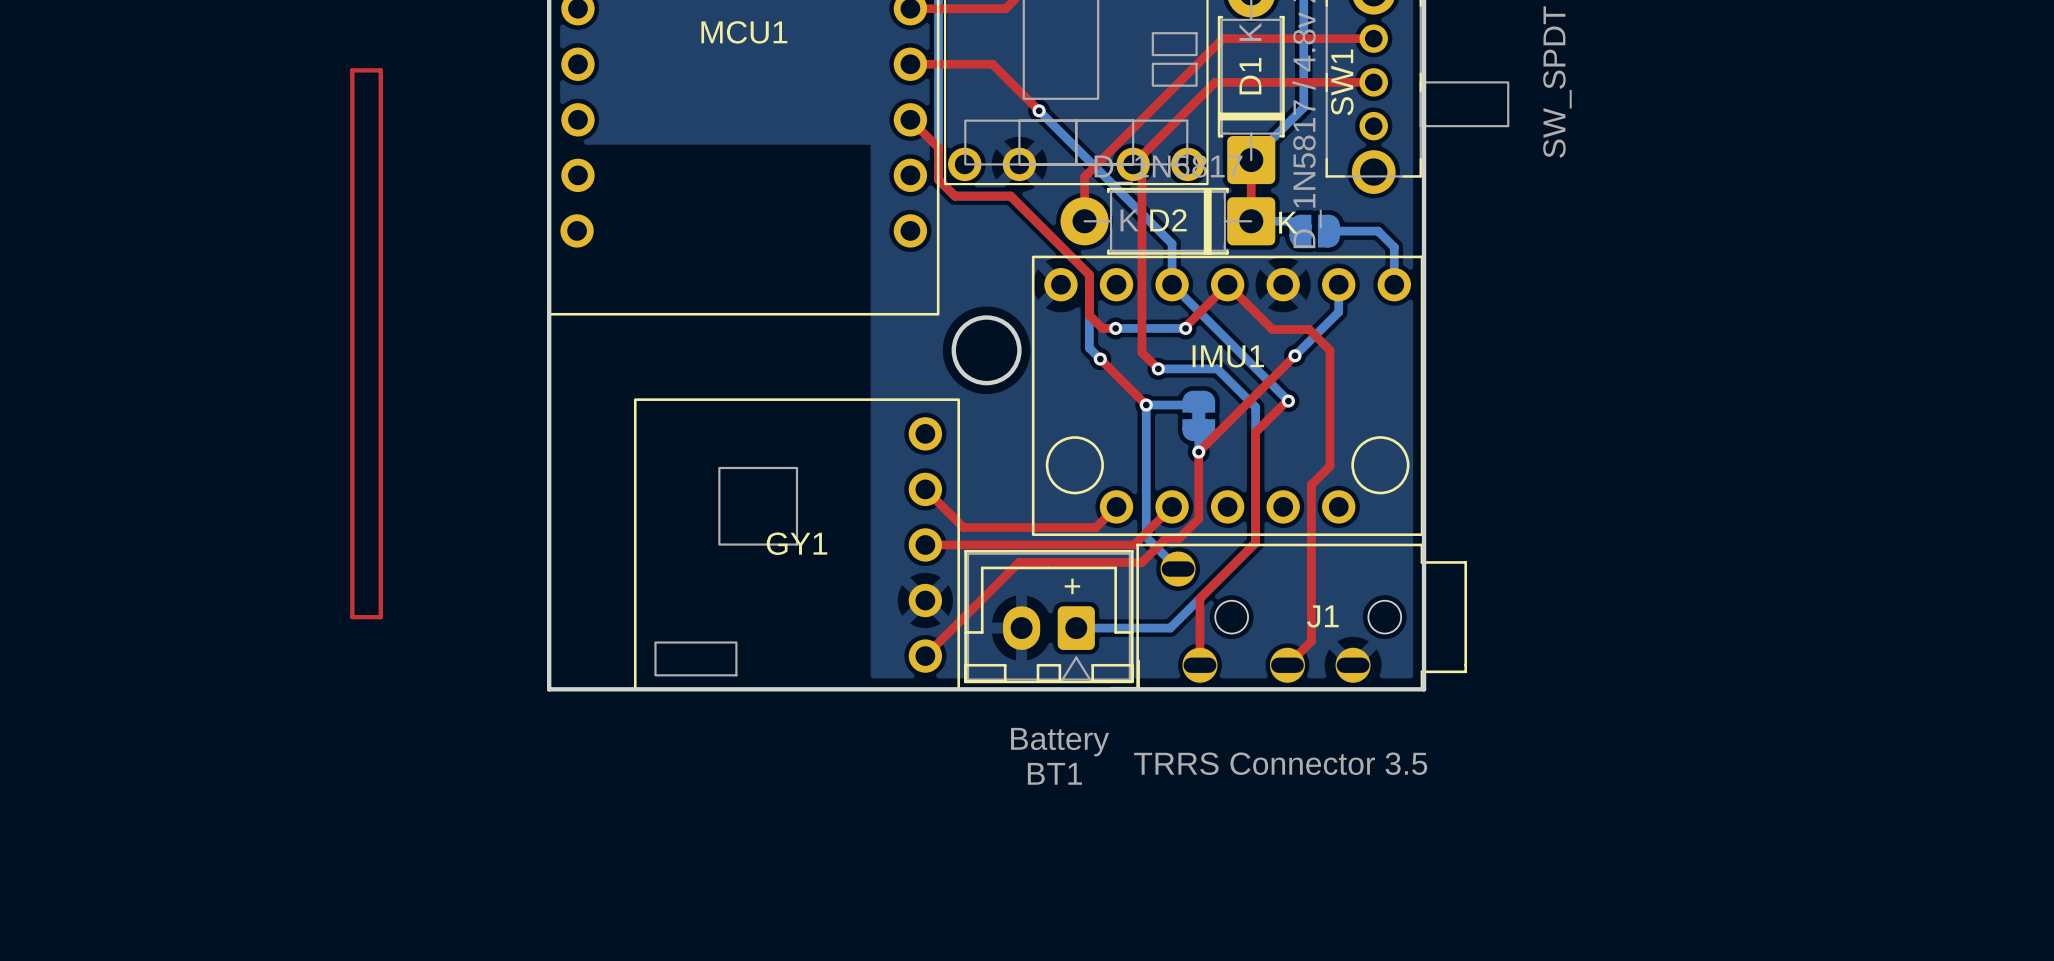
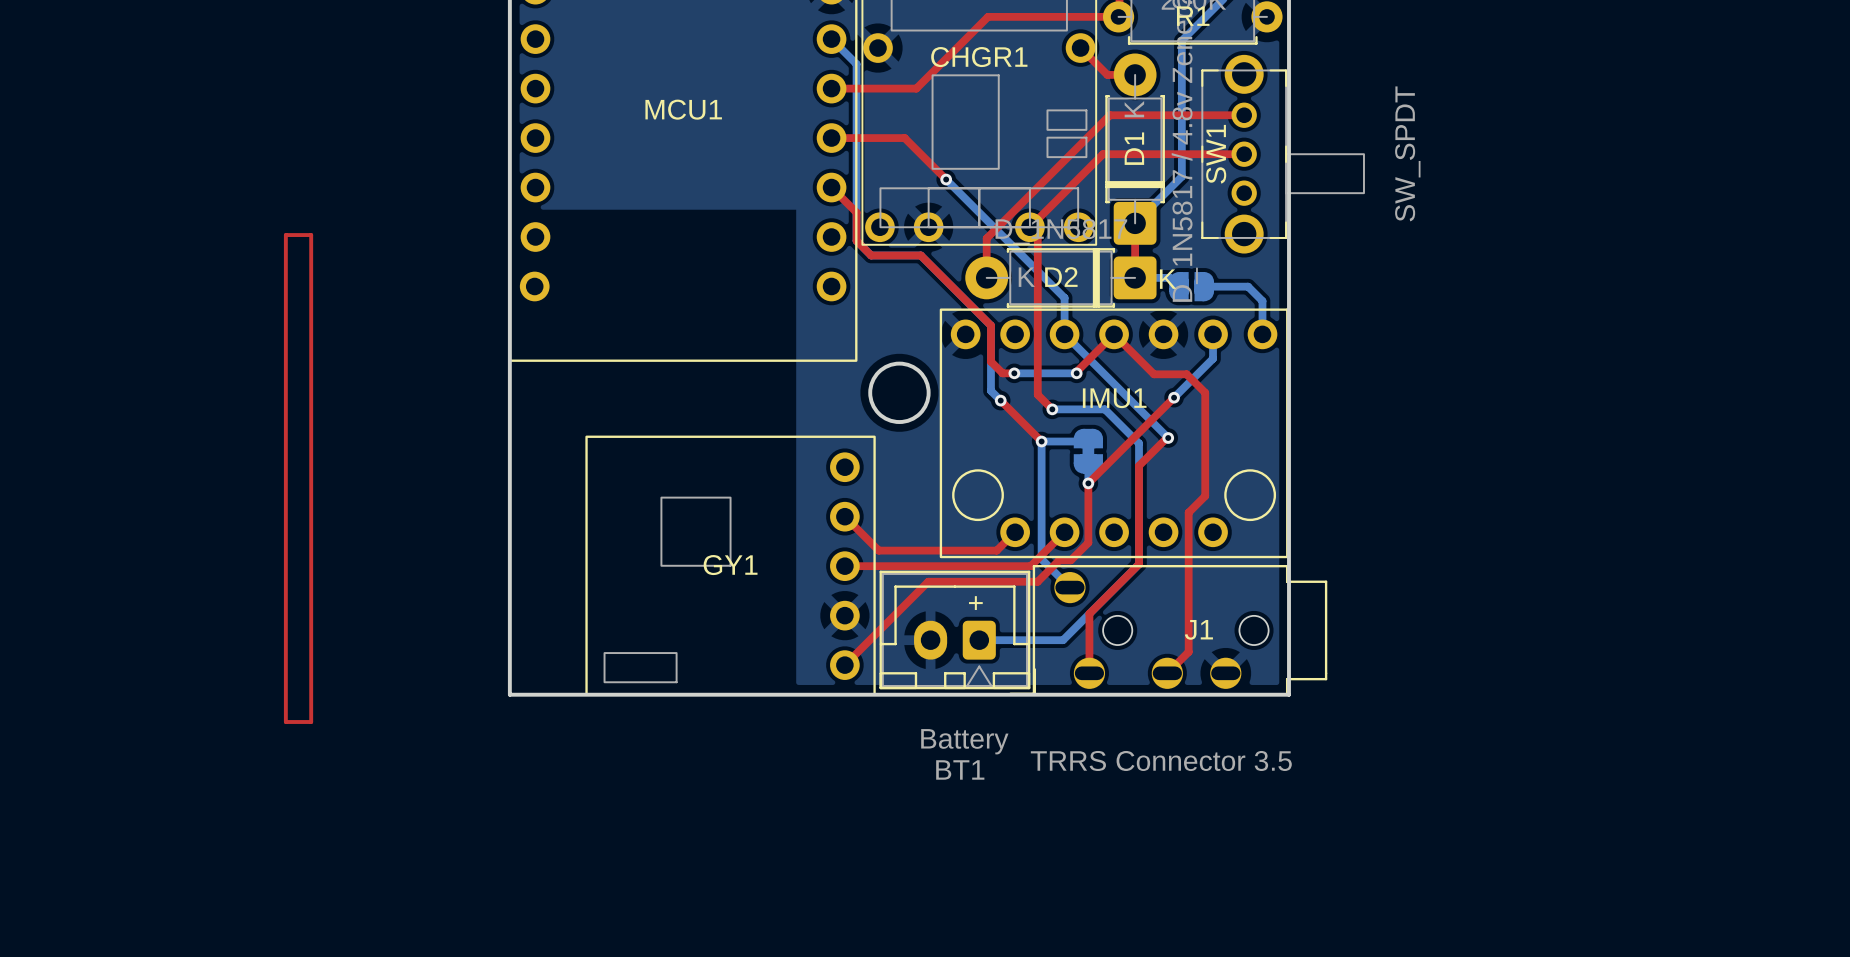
top track: (352, 70) (380, 70) (380, 617) (352, 617) (352, 70) -> (285, 235) (311, 235) (311, 721) (285, 721) (285, 235)

